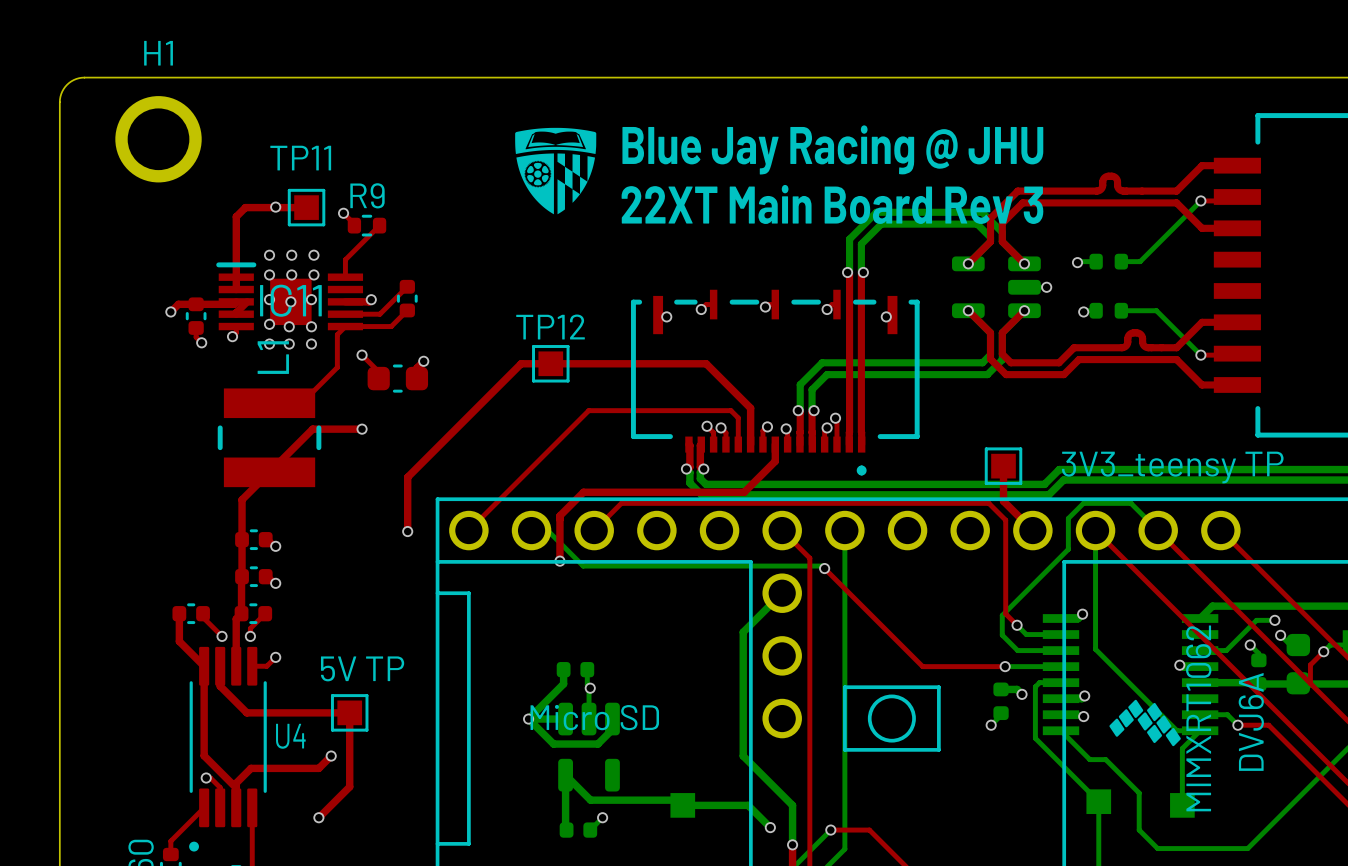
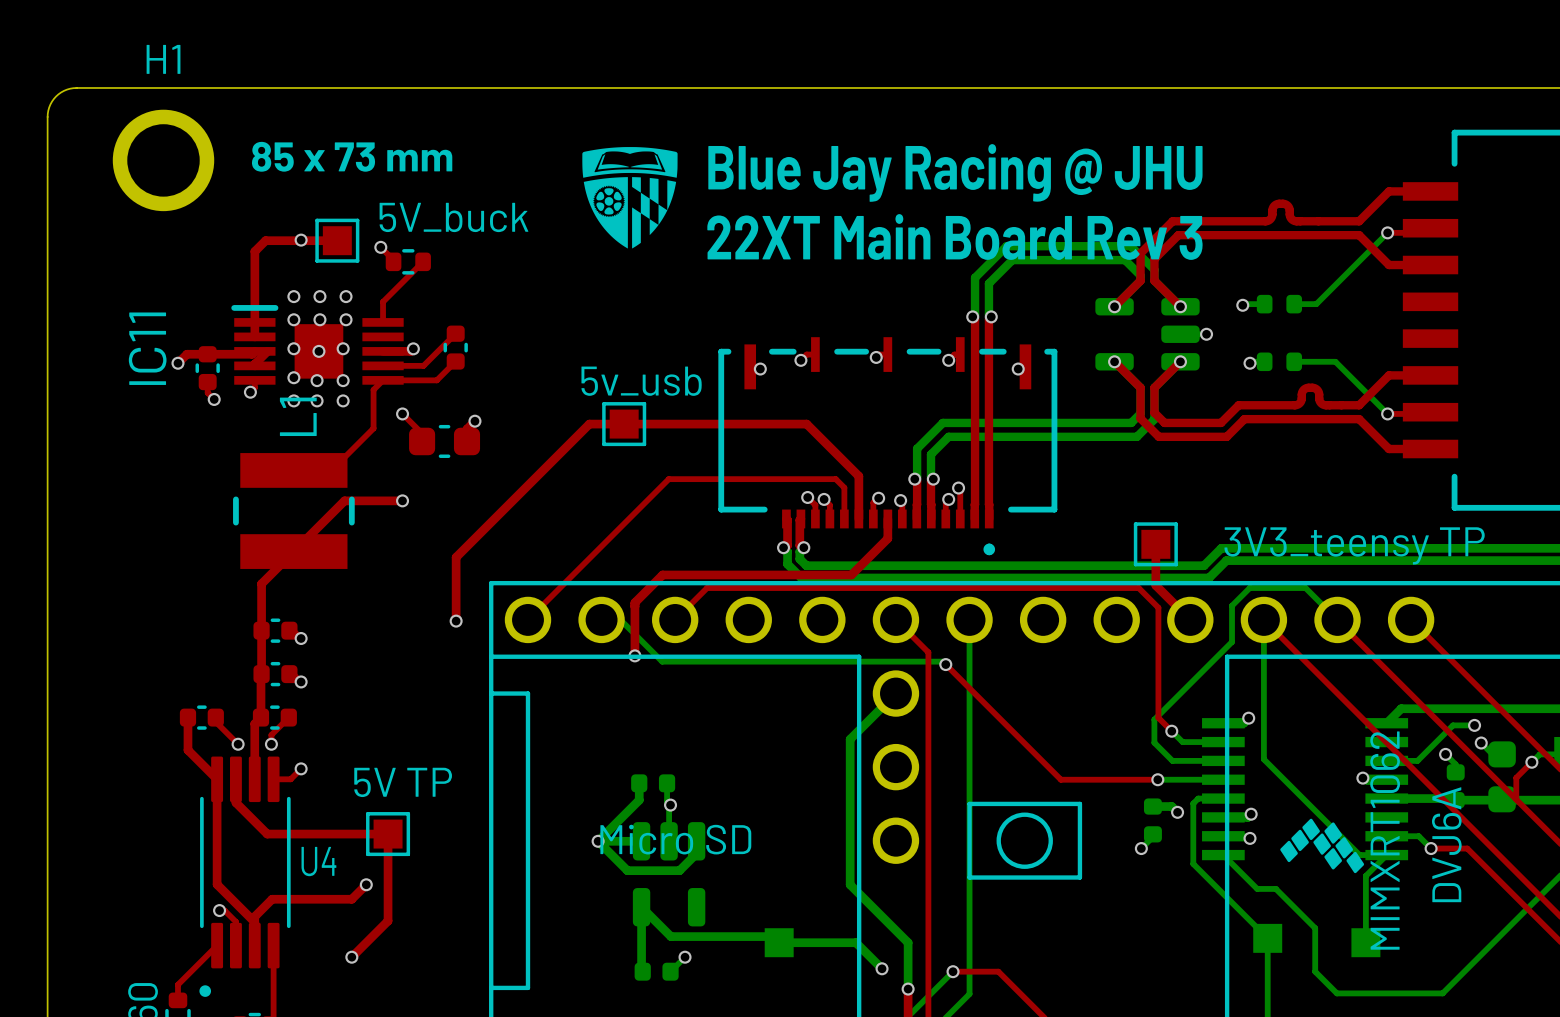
text: none -> 85 x 73 mm (352, 156)
TP11 name: TP11 (300, 158) -> 5V_buck (453, 217)
R9 name: R9 (367, 195) -> none
IC11 name rotation: 0° (290, 300) -> 90° counterclockwise (147, 348)
IC11 name position: IC11 (290, 300) -> IC11 (147, 348)
TP12 name: TP12 (550, 326) -> 5v_usb (641, 381)

